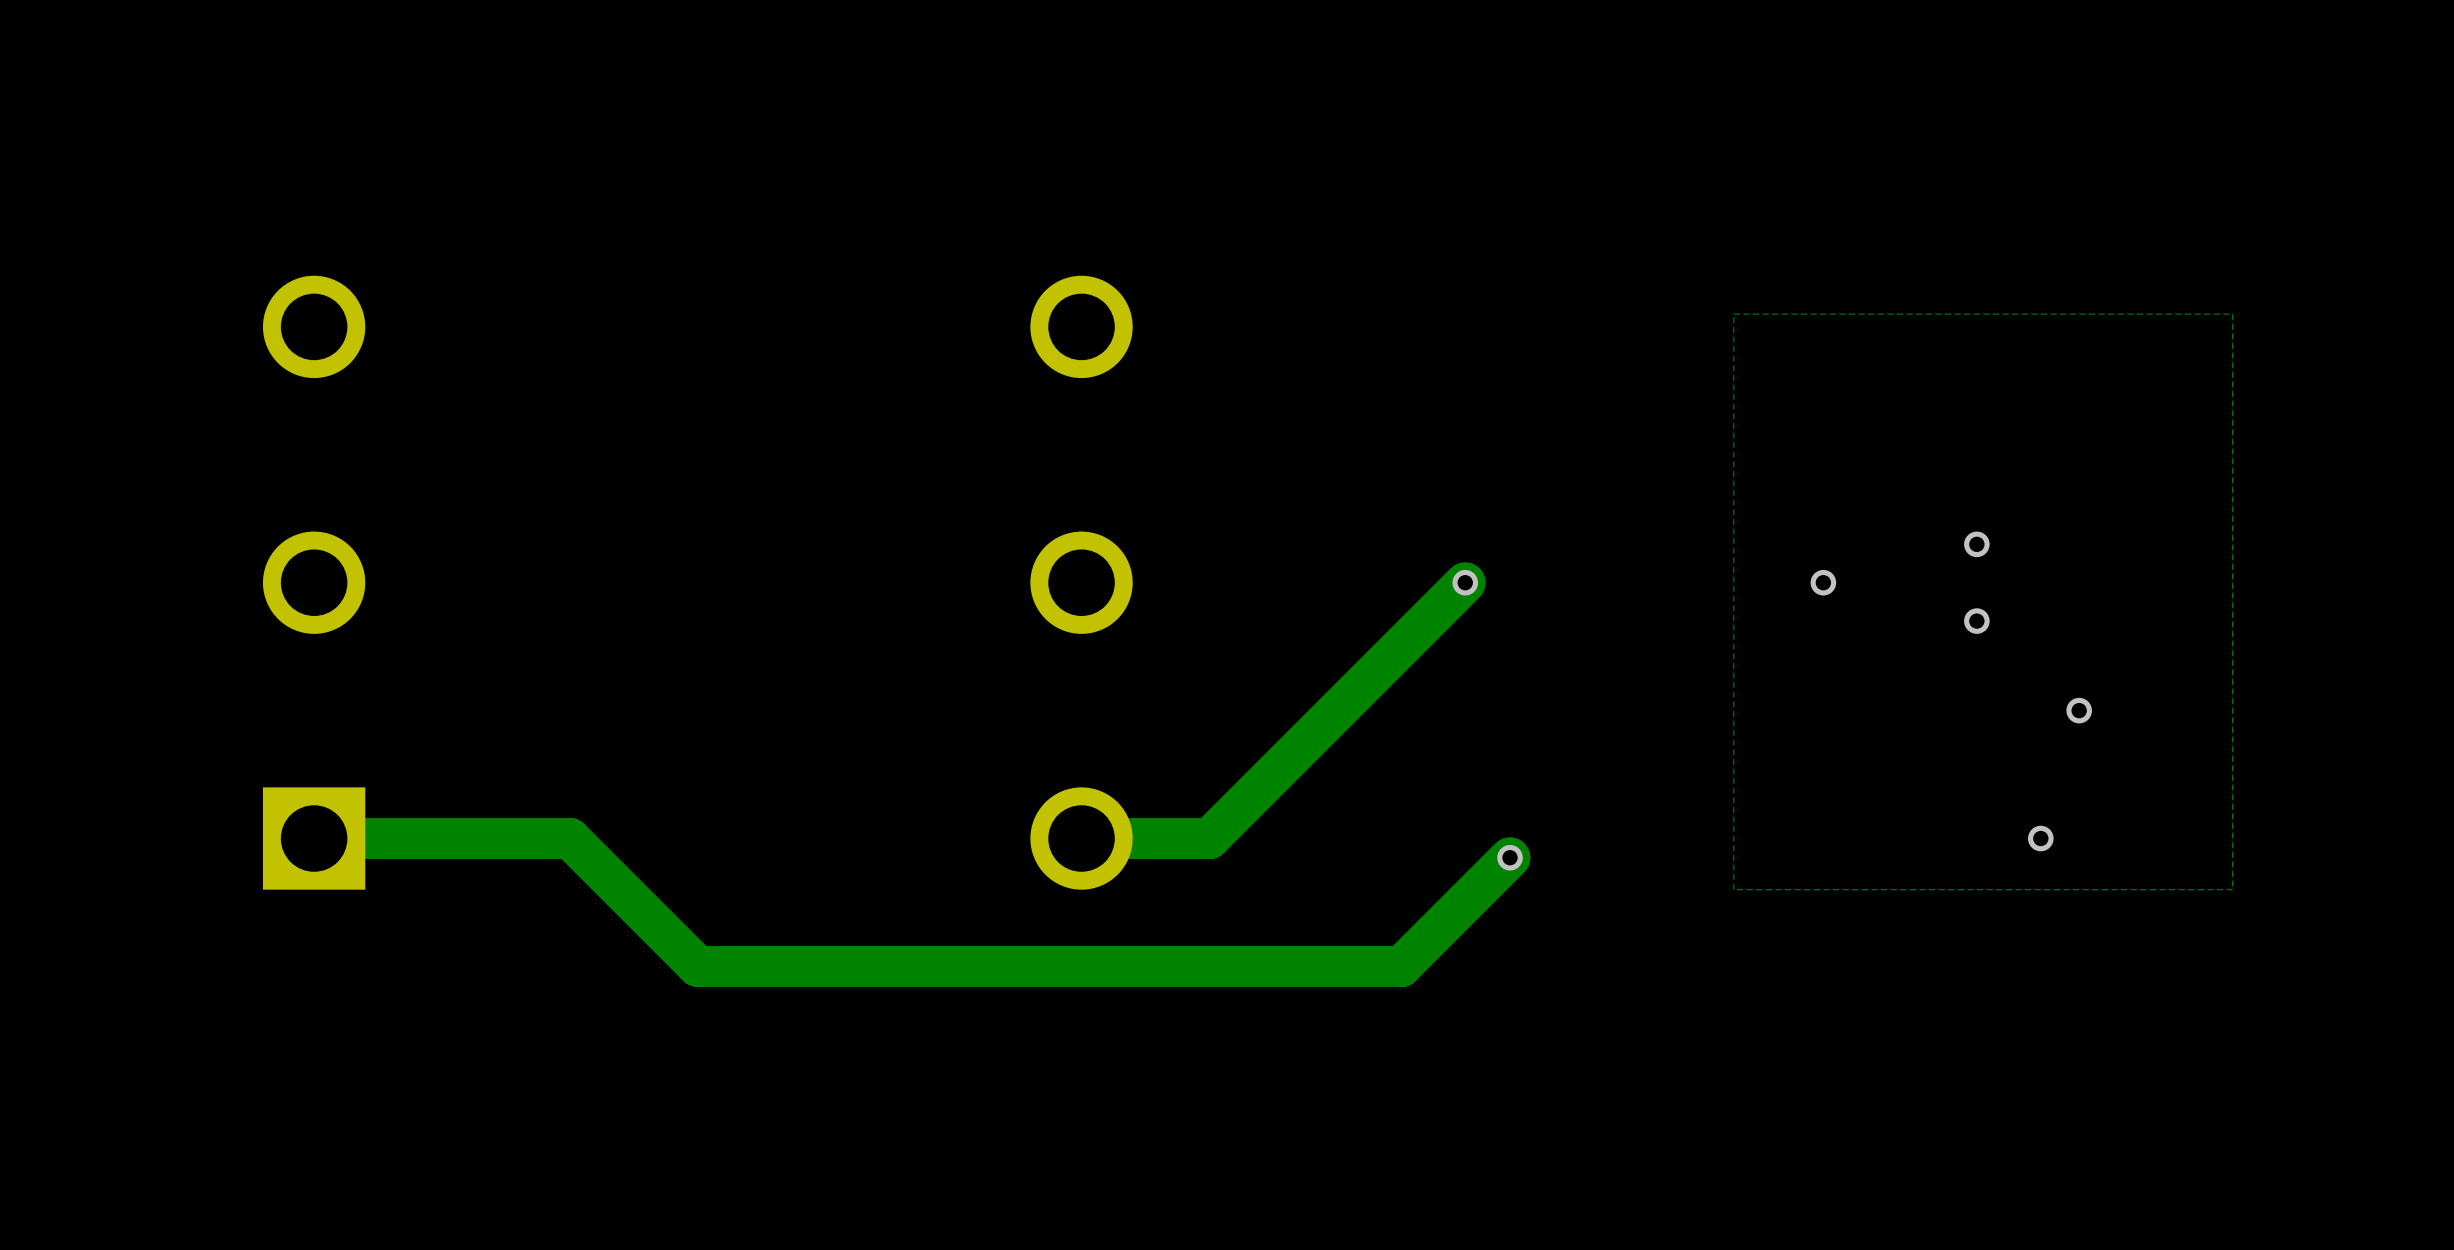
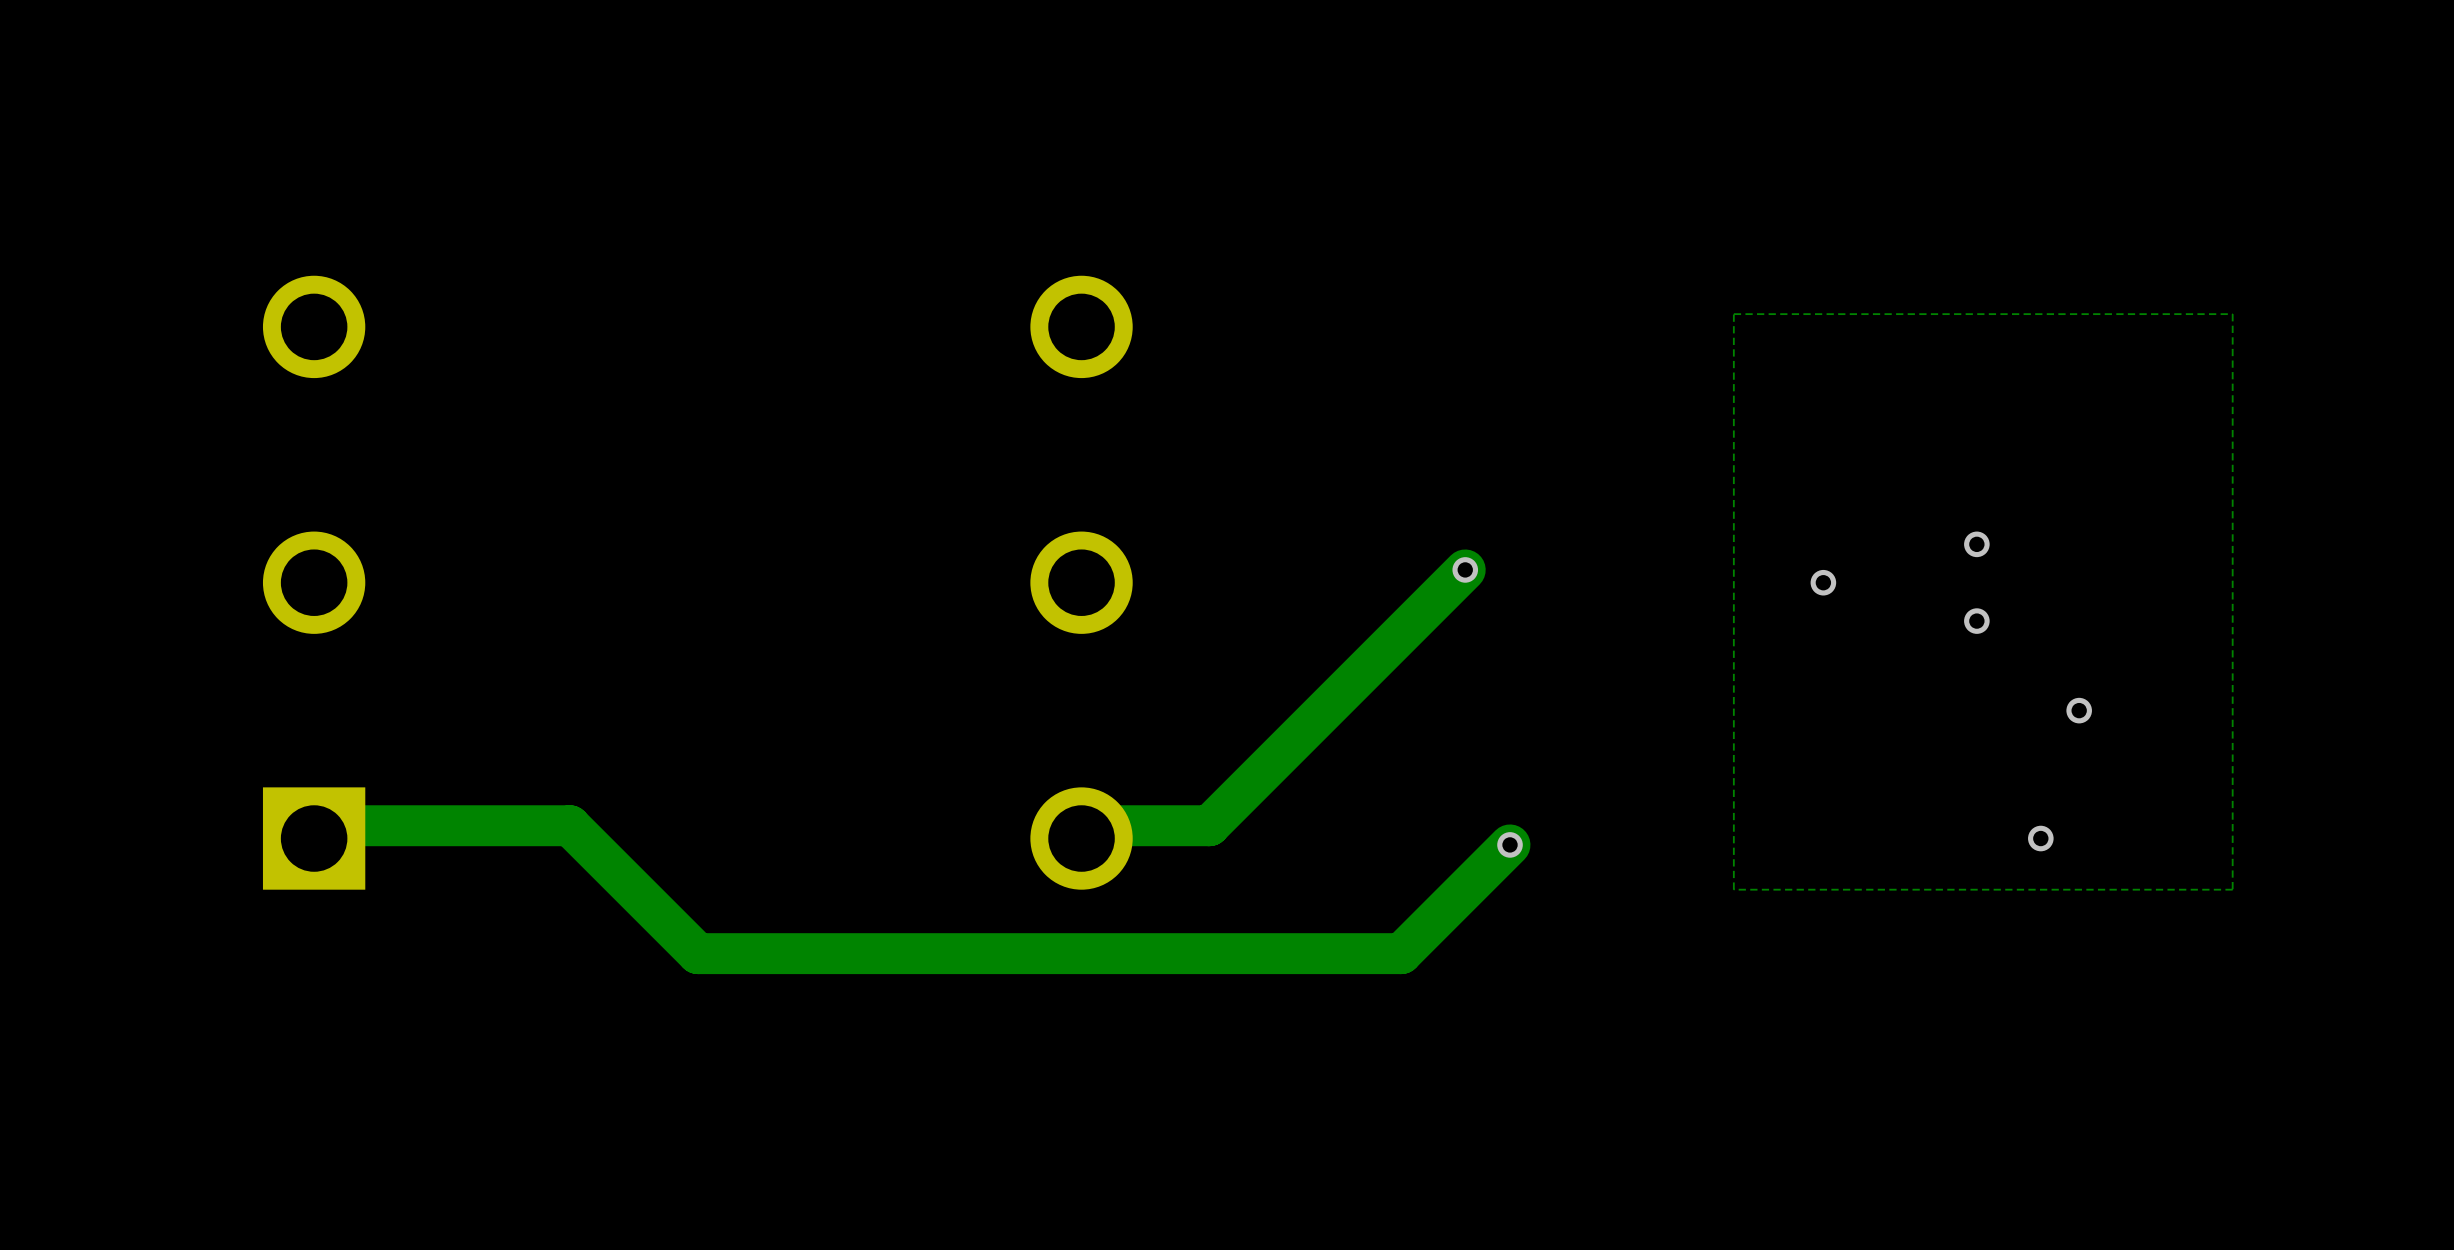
track: (1465, 582) (1209, 838) (1081, 838) -> (1465, 569) (1209, 825) (1081, 825)
via position: (1465, 582) -> (1465, 569)
track: (314, 838) (569, 838) (697, 966) (1401, 966) (1510, 857) -> (314, 825) (569, 825) (697, 953) (1401, 953) (1510, 844)
via position: (1510, 857) -> (1510, 844)

